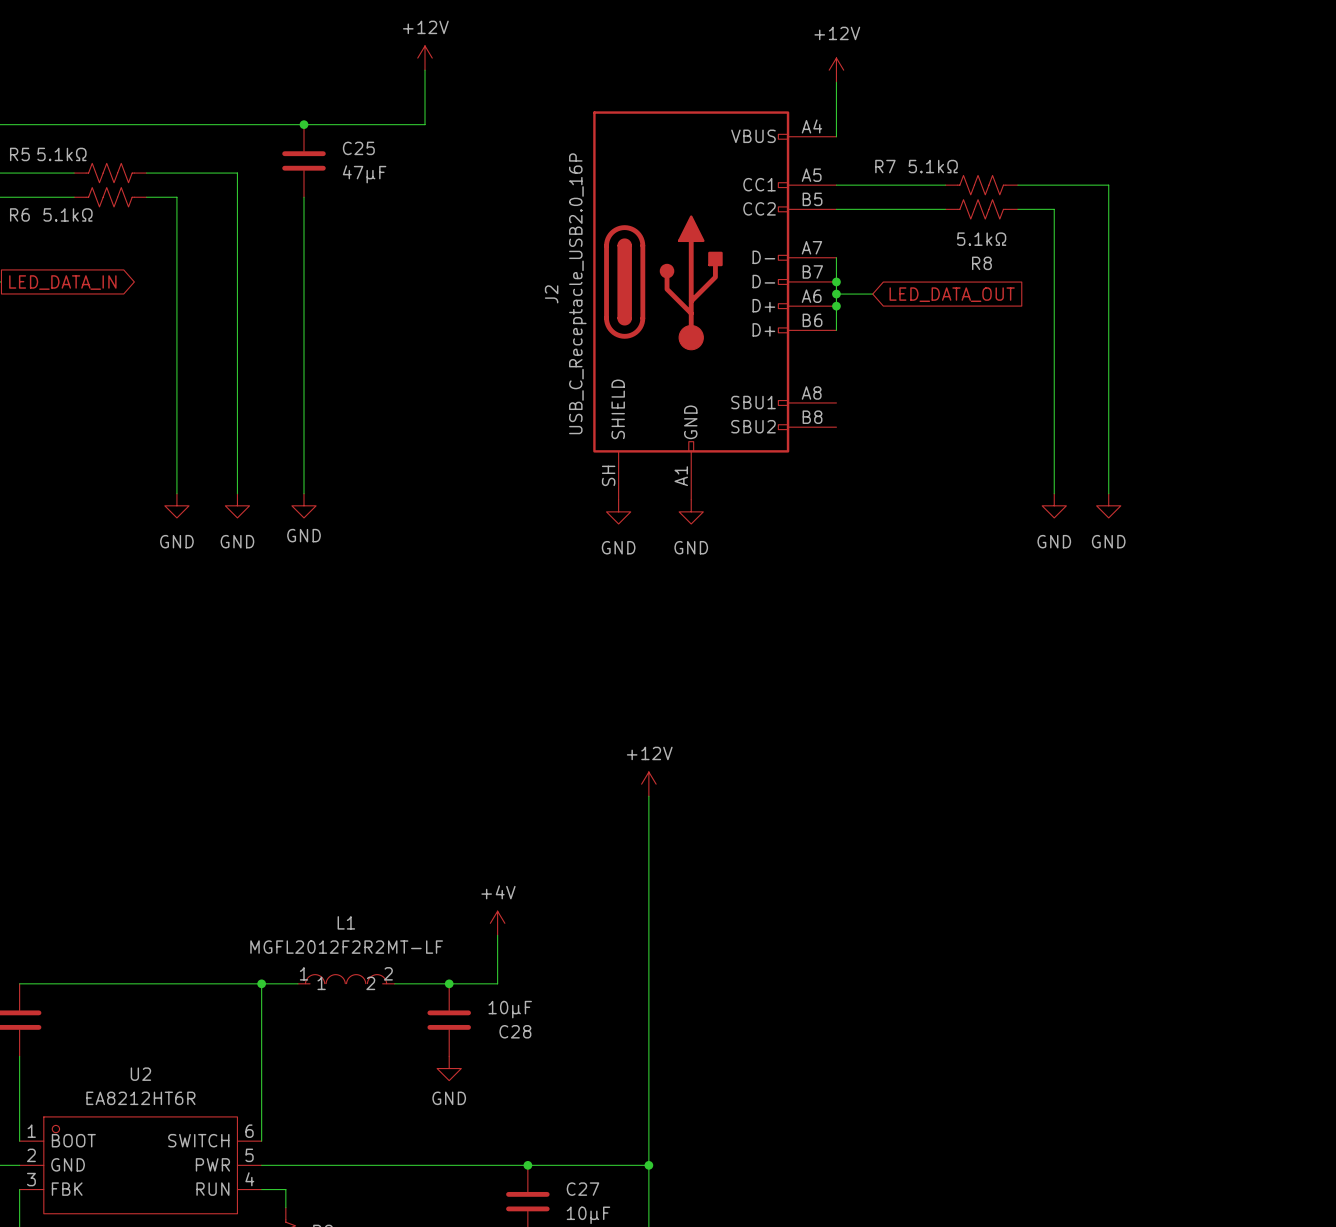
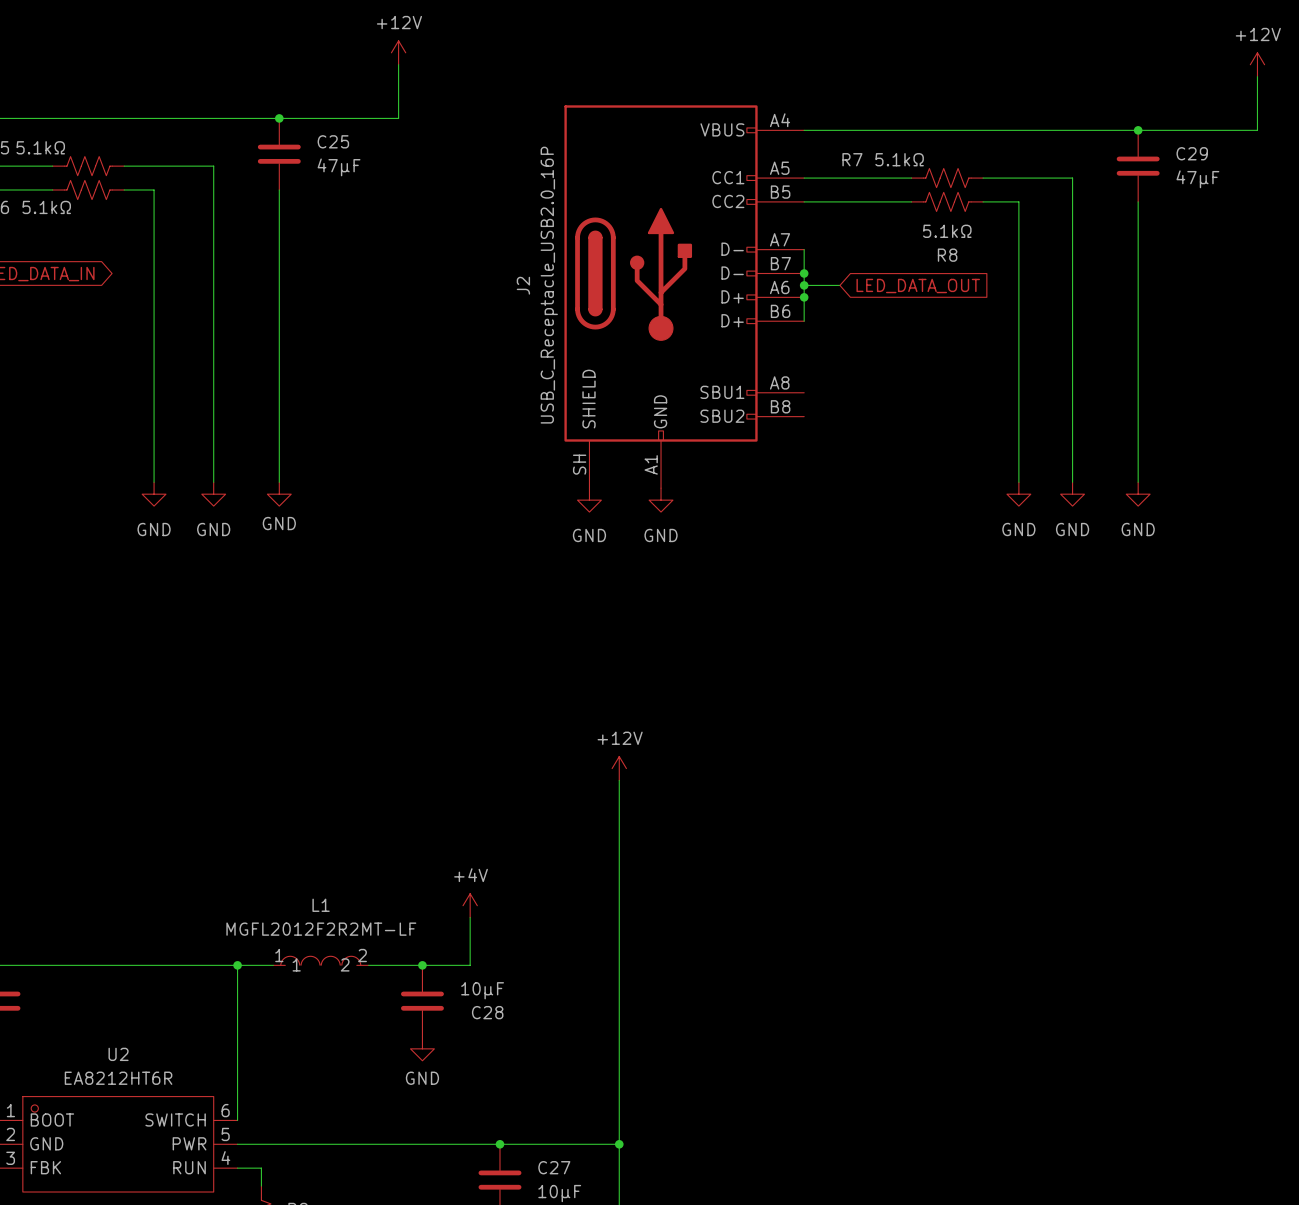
power symbol: +12V (836, 70) -> none
power symbol: none -> +12V (1257, 64)
wire: (836, 82) (836, 136) -> (1257, 76) (1257, 130) (804, 130)
junction: none -> (1138, 130)
C29: none -> 47µF (1138, 166)
wire: none -> (1138, 201) (1138, 482)
power symbol: none -> GND (1138, 494)

